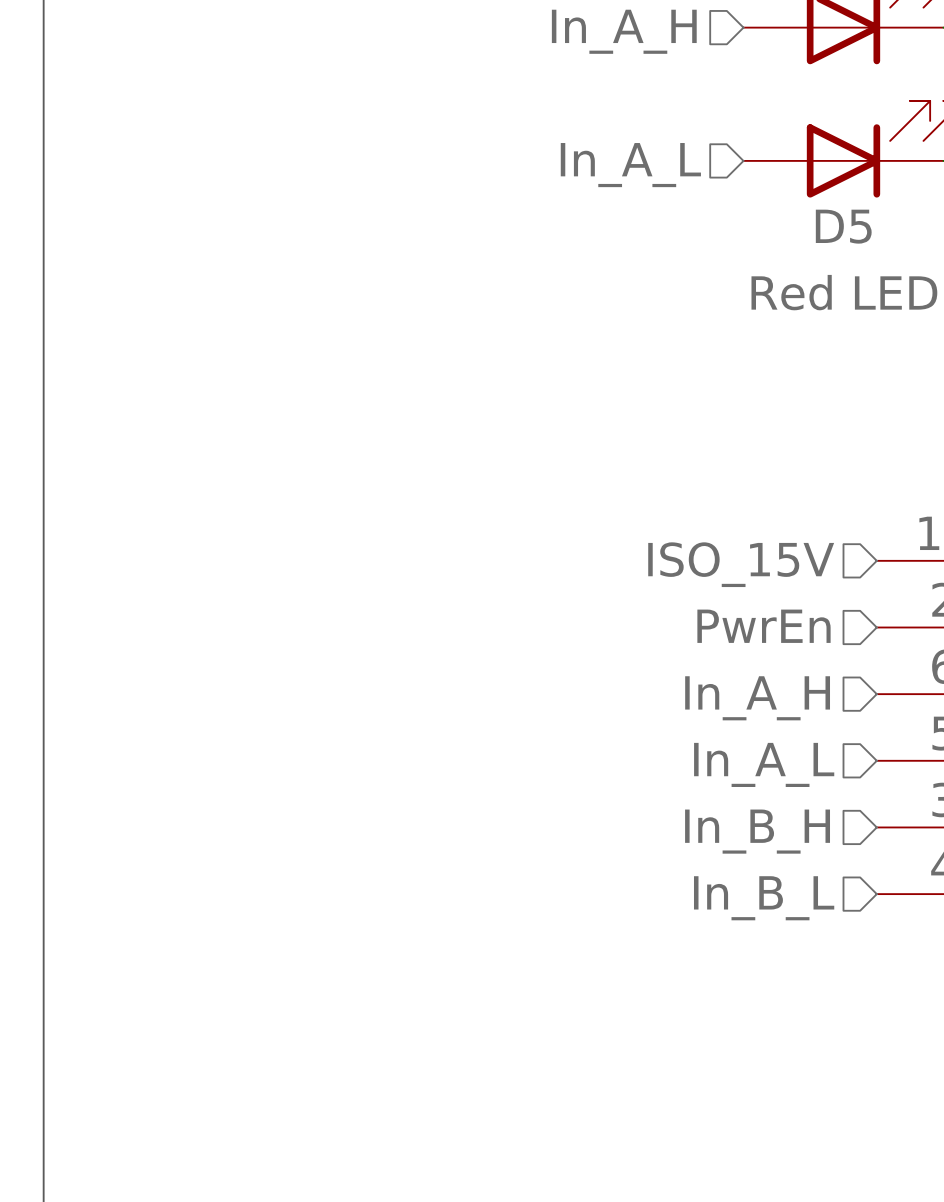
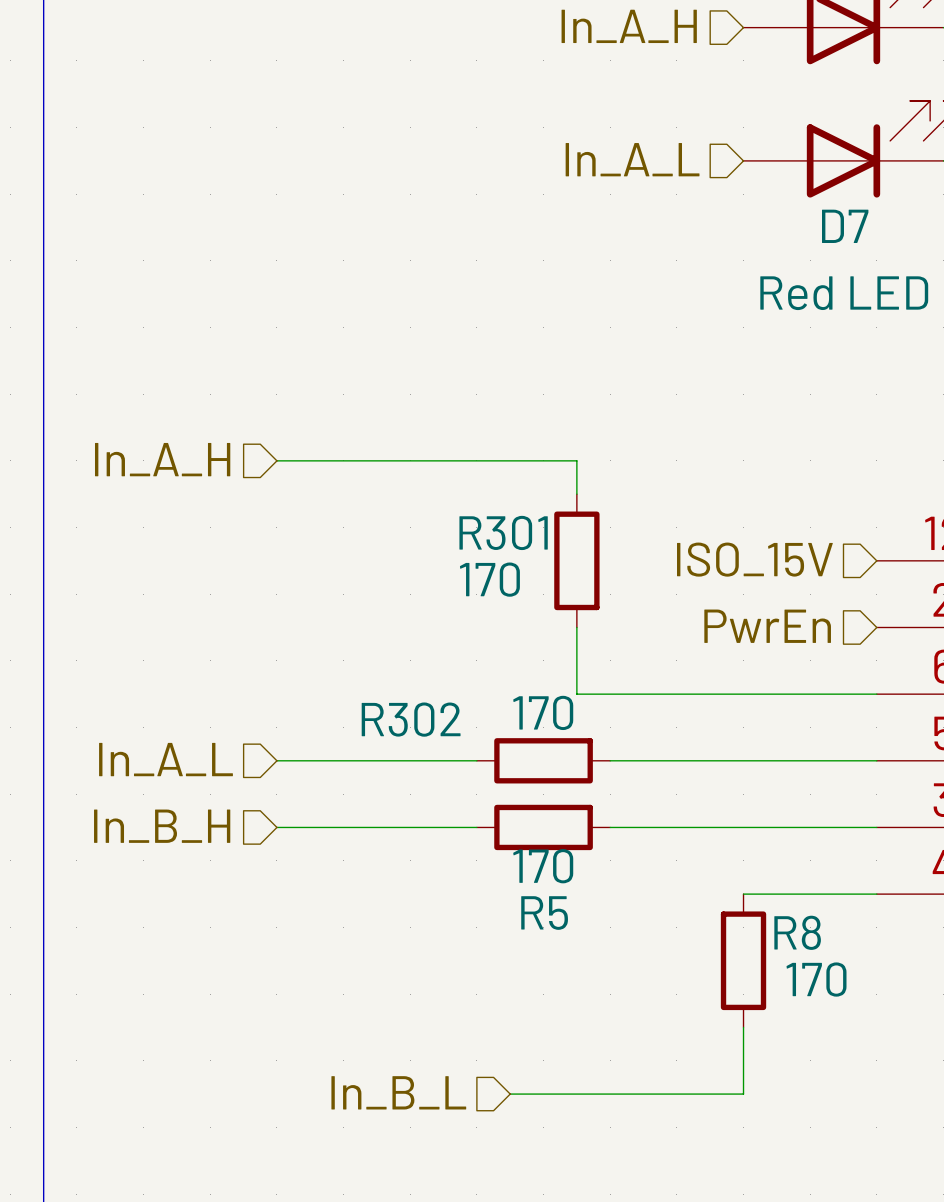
D5 name: D5 (843, 226) -> D7 (845, 226)
wire: none -> (276, 460) (576, 460) (576, 494)
R301: none -> 170 (576, 560)
wire: none -> (576, 627) (576, 694) (876, 694)
hierarchical label position: In_A_H (757, 698) -> In_A_H (162, 459)
wire: none -> (276, 760) (476, 760)
R302: none -> 170 (543, 760)
wire: none -> (610, 760) (876, 760)
hierarchical label position: In_A_L (764, 764) -> In_A_L (165, 759)
wire: none -> (276, 827) (476, 827)
R5: none -> 170 (543, 827)
wire: none -> (610, 827) (876, 827)
hierarchical label position: In_B_H (757, 831) -> In_B_H (162, 826)
wire: none -> (743, 894) (876, 894)
hierarchical label position: In_B_L (764, 898) -> In_B_L (398, 1092)
R8: none -> 170 (743, 960)
wire: none -> (743, 1027) (743, 1094) (510, 1094)

